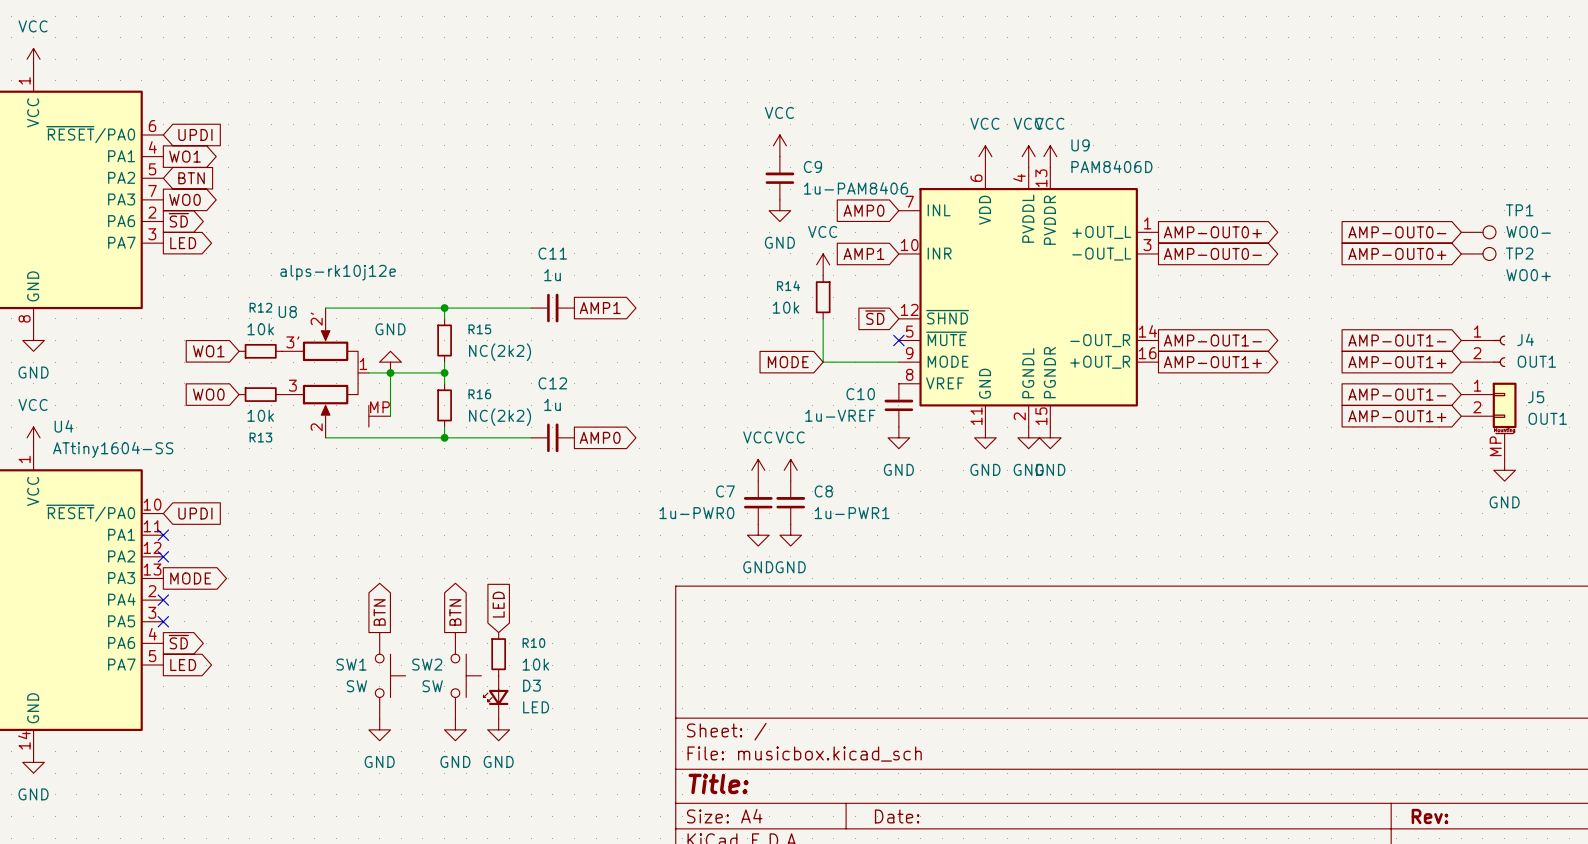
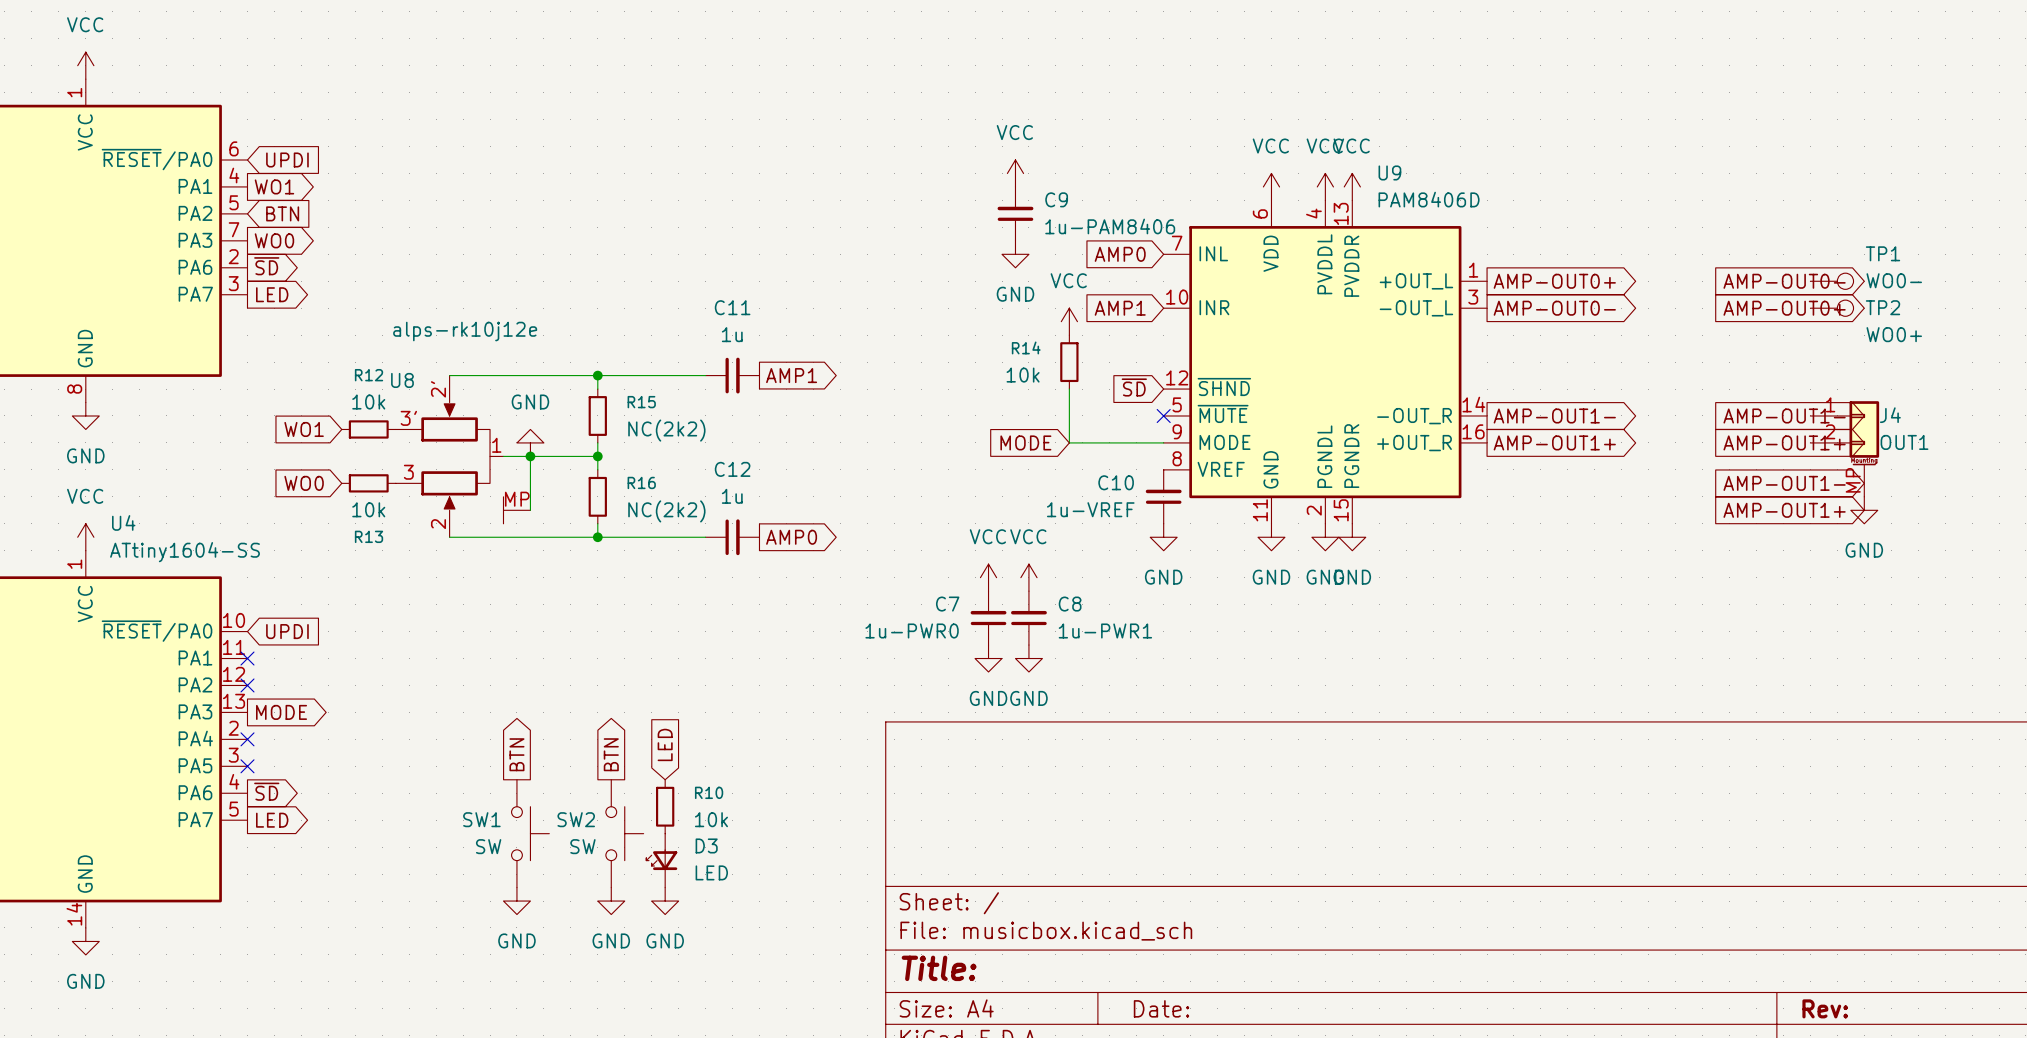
TP1 position: (1478, 232) -> (1831, 281)
TP2 position: (1478, 253) -> (1831, 308)
J4 symbol: [1461, 335, 1506, 368] -> [1810, 401, 1880, 497]
J5: OUT1 (1488, 421) -> none
power symbol position: GND (1504, 470) -> GND (1864, 510)

